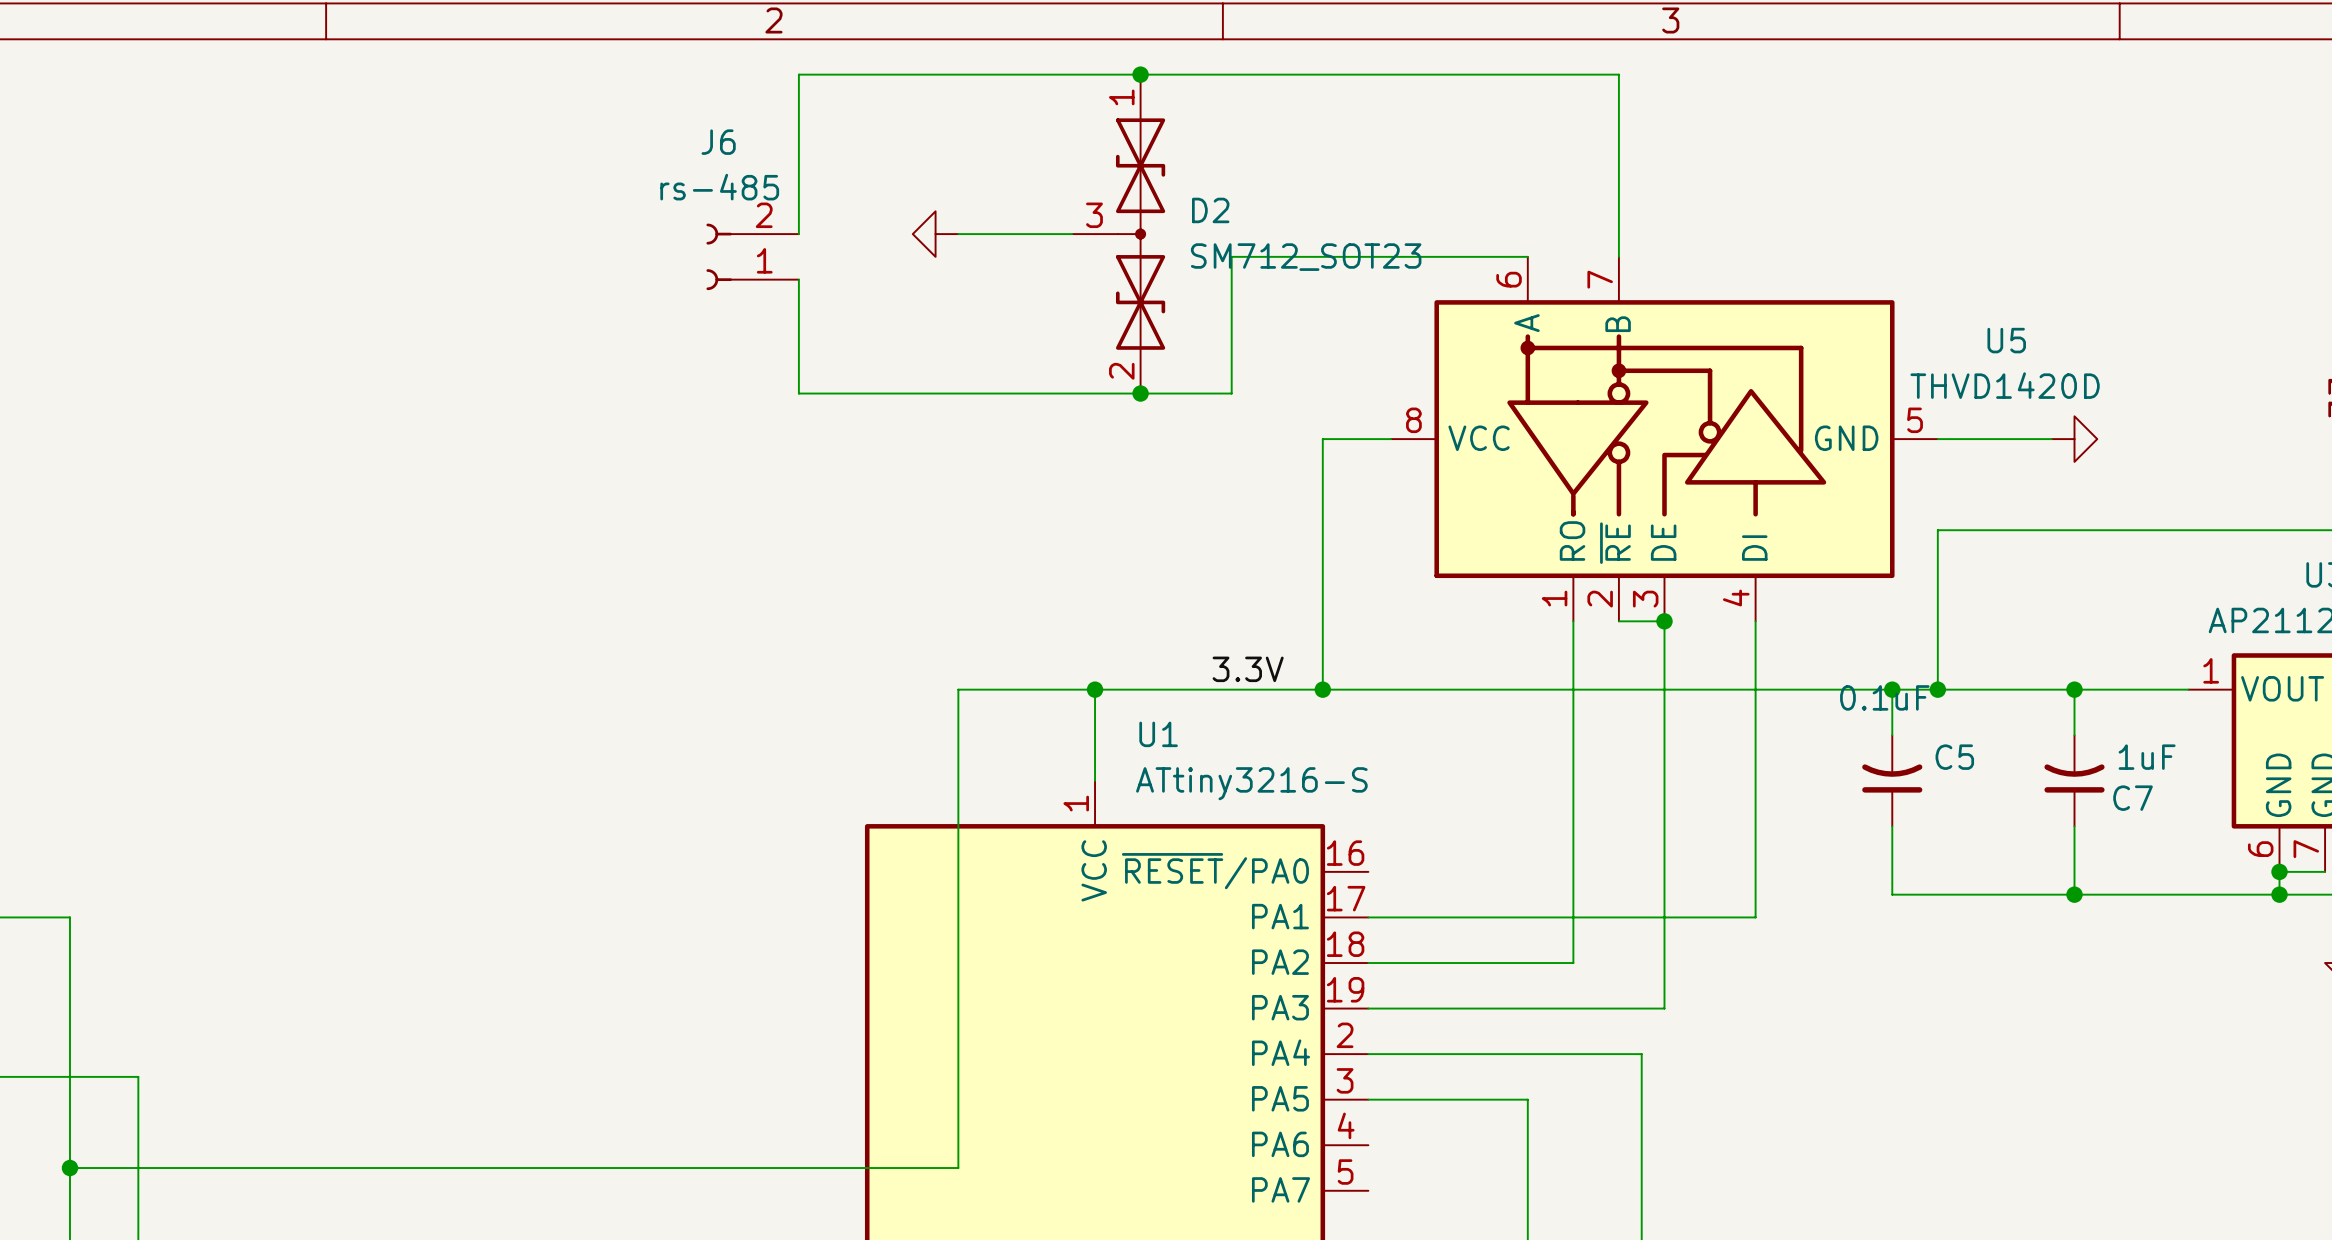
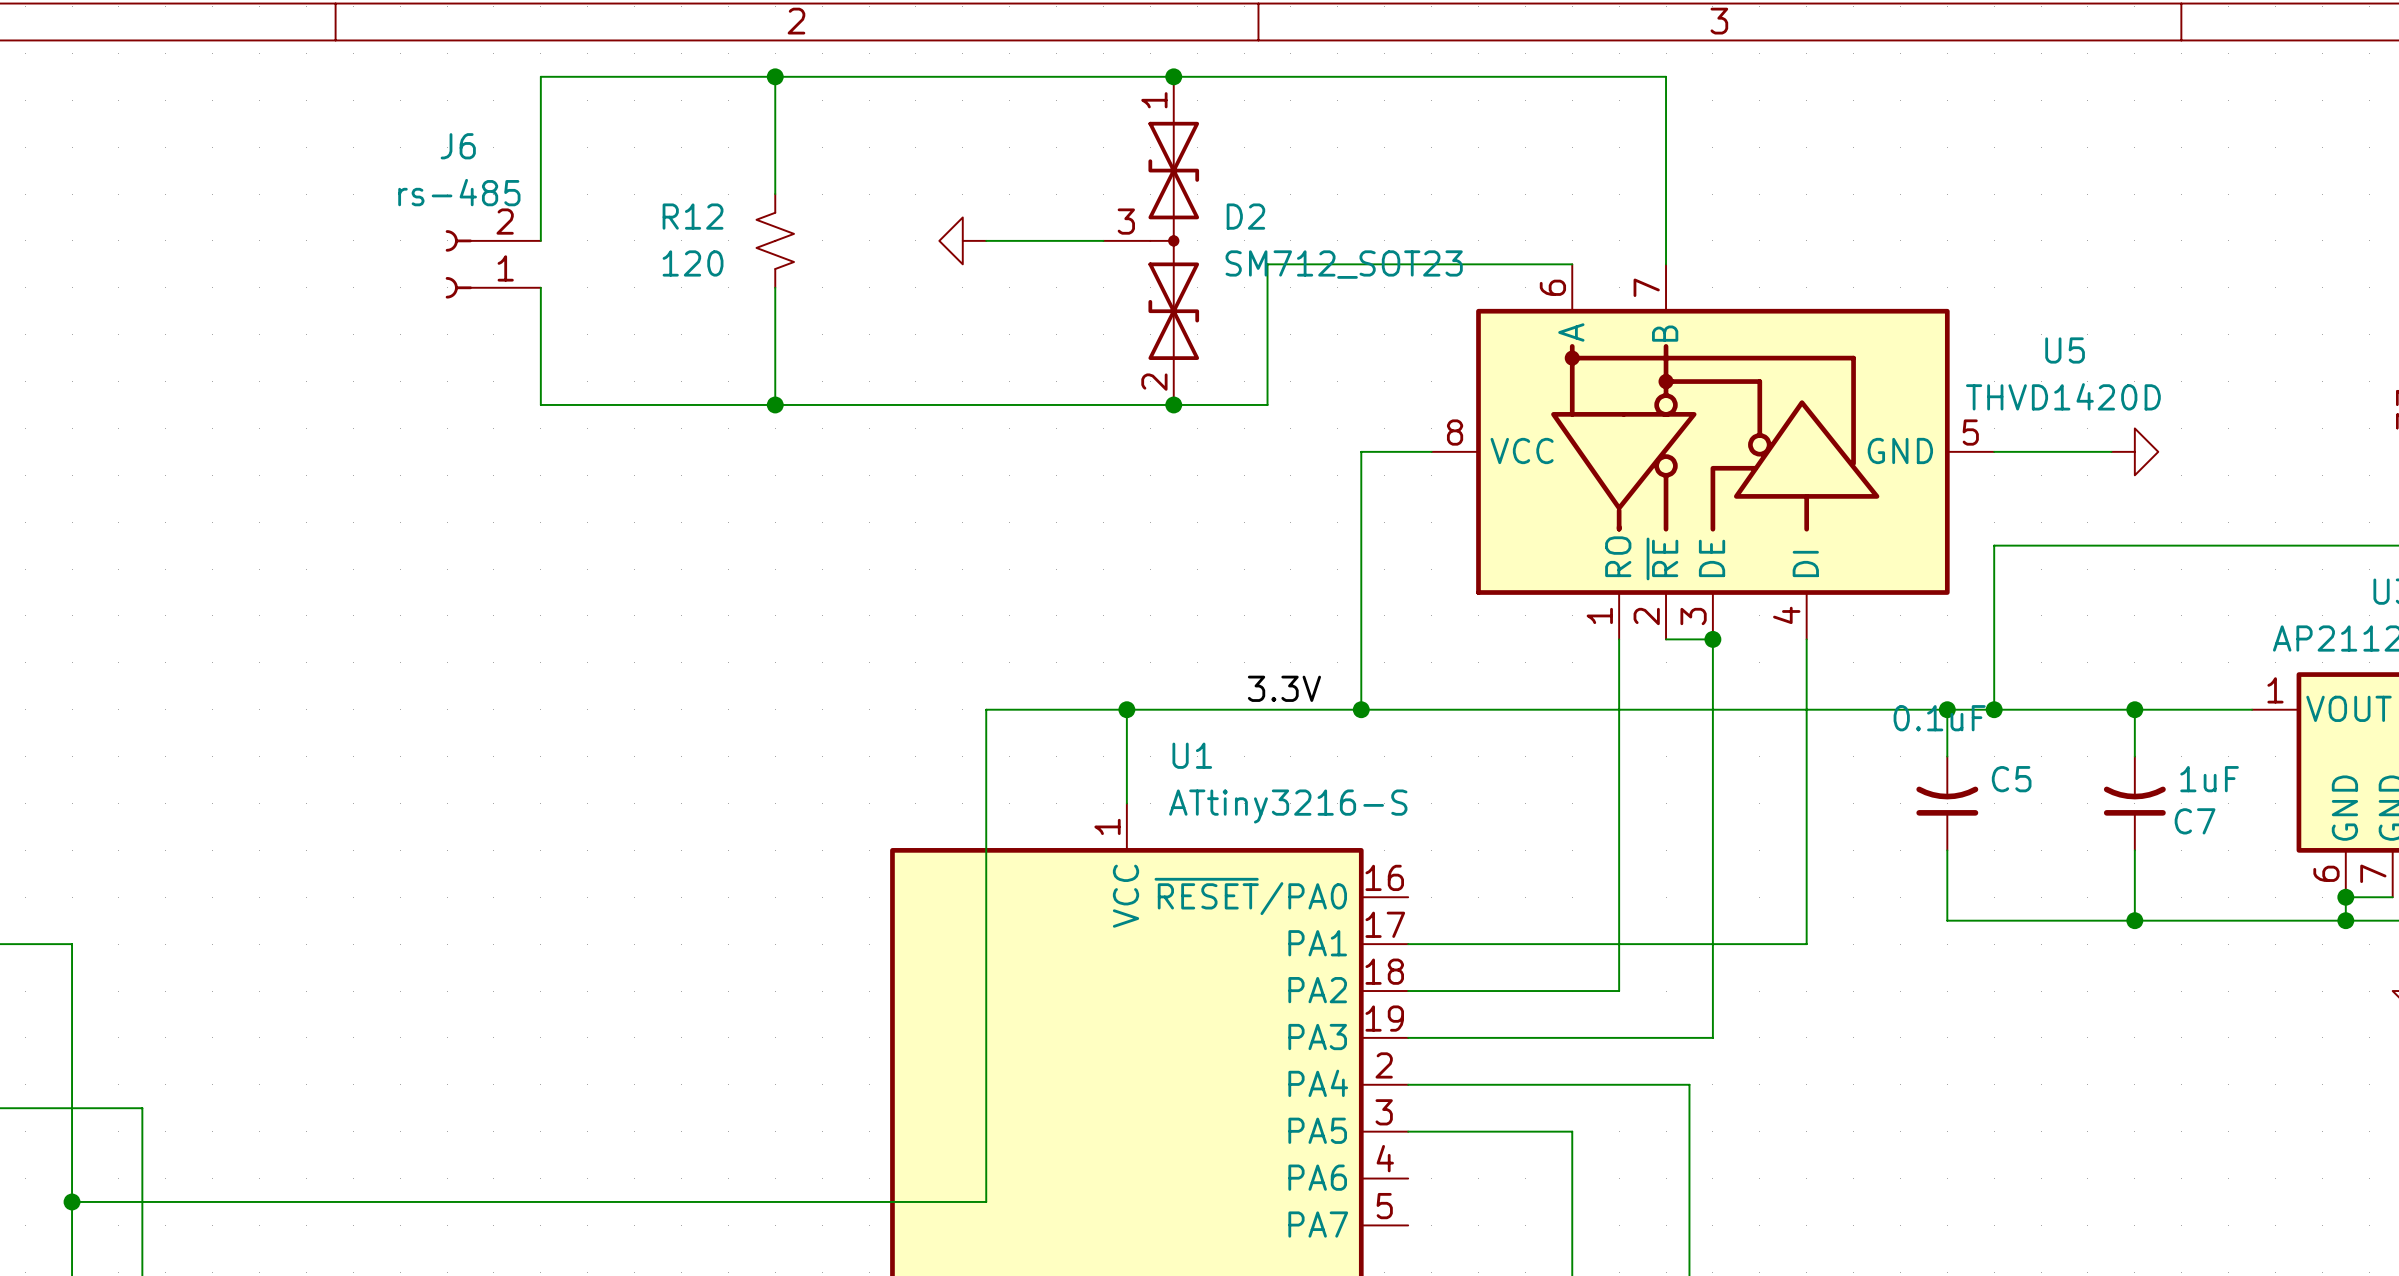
wire: none -> (775, 76) (775, 194)
junction: none -> (775, 76)
wire: (798, 74) (798, 234) -> (822, 76) (540, 76) (540, 240)
R12: none -> 120 (775, 240)
J6 position: (752, 256) -> (493, 264)
wire: none -> (775, 287) (775, 404)
wire: (798, 279) (798, 393) -> (540, 287) (540, 404) (822, 404)
junction: none -> (775, 404)

